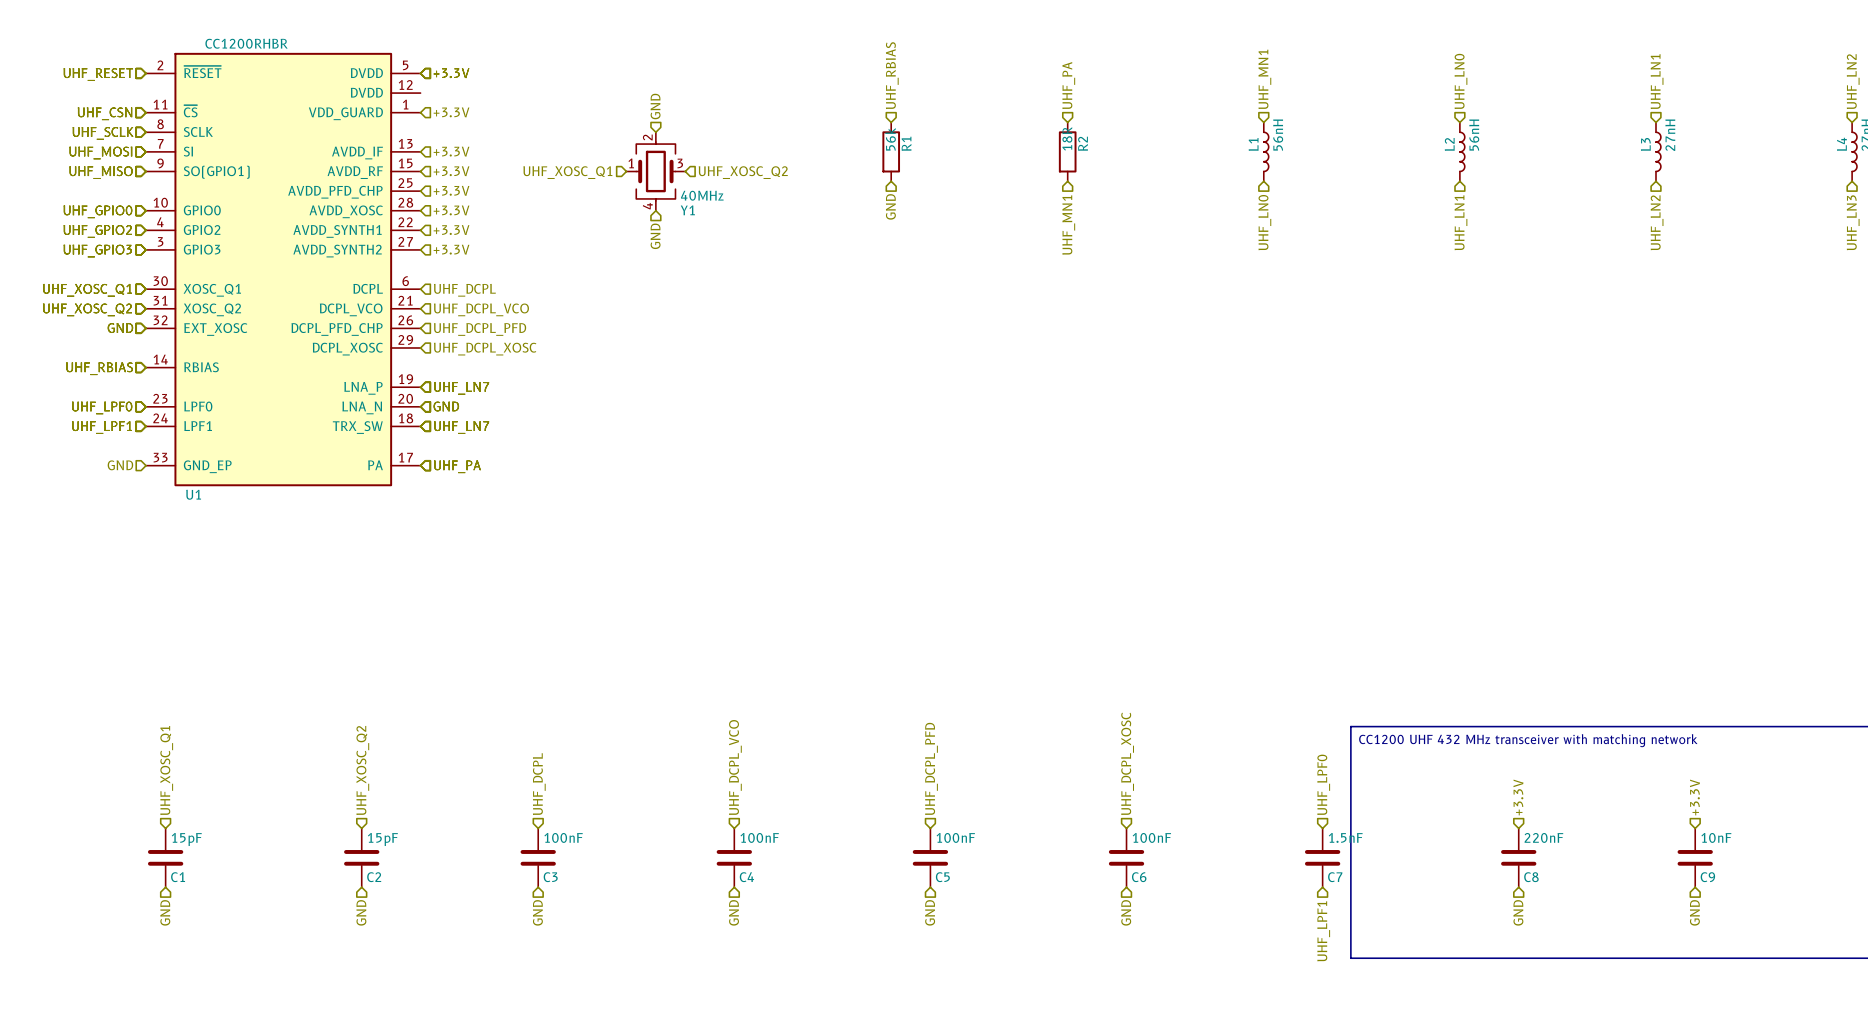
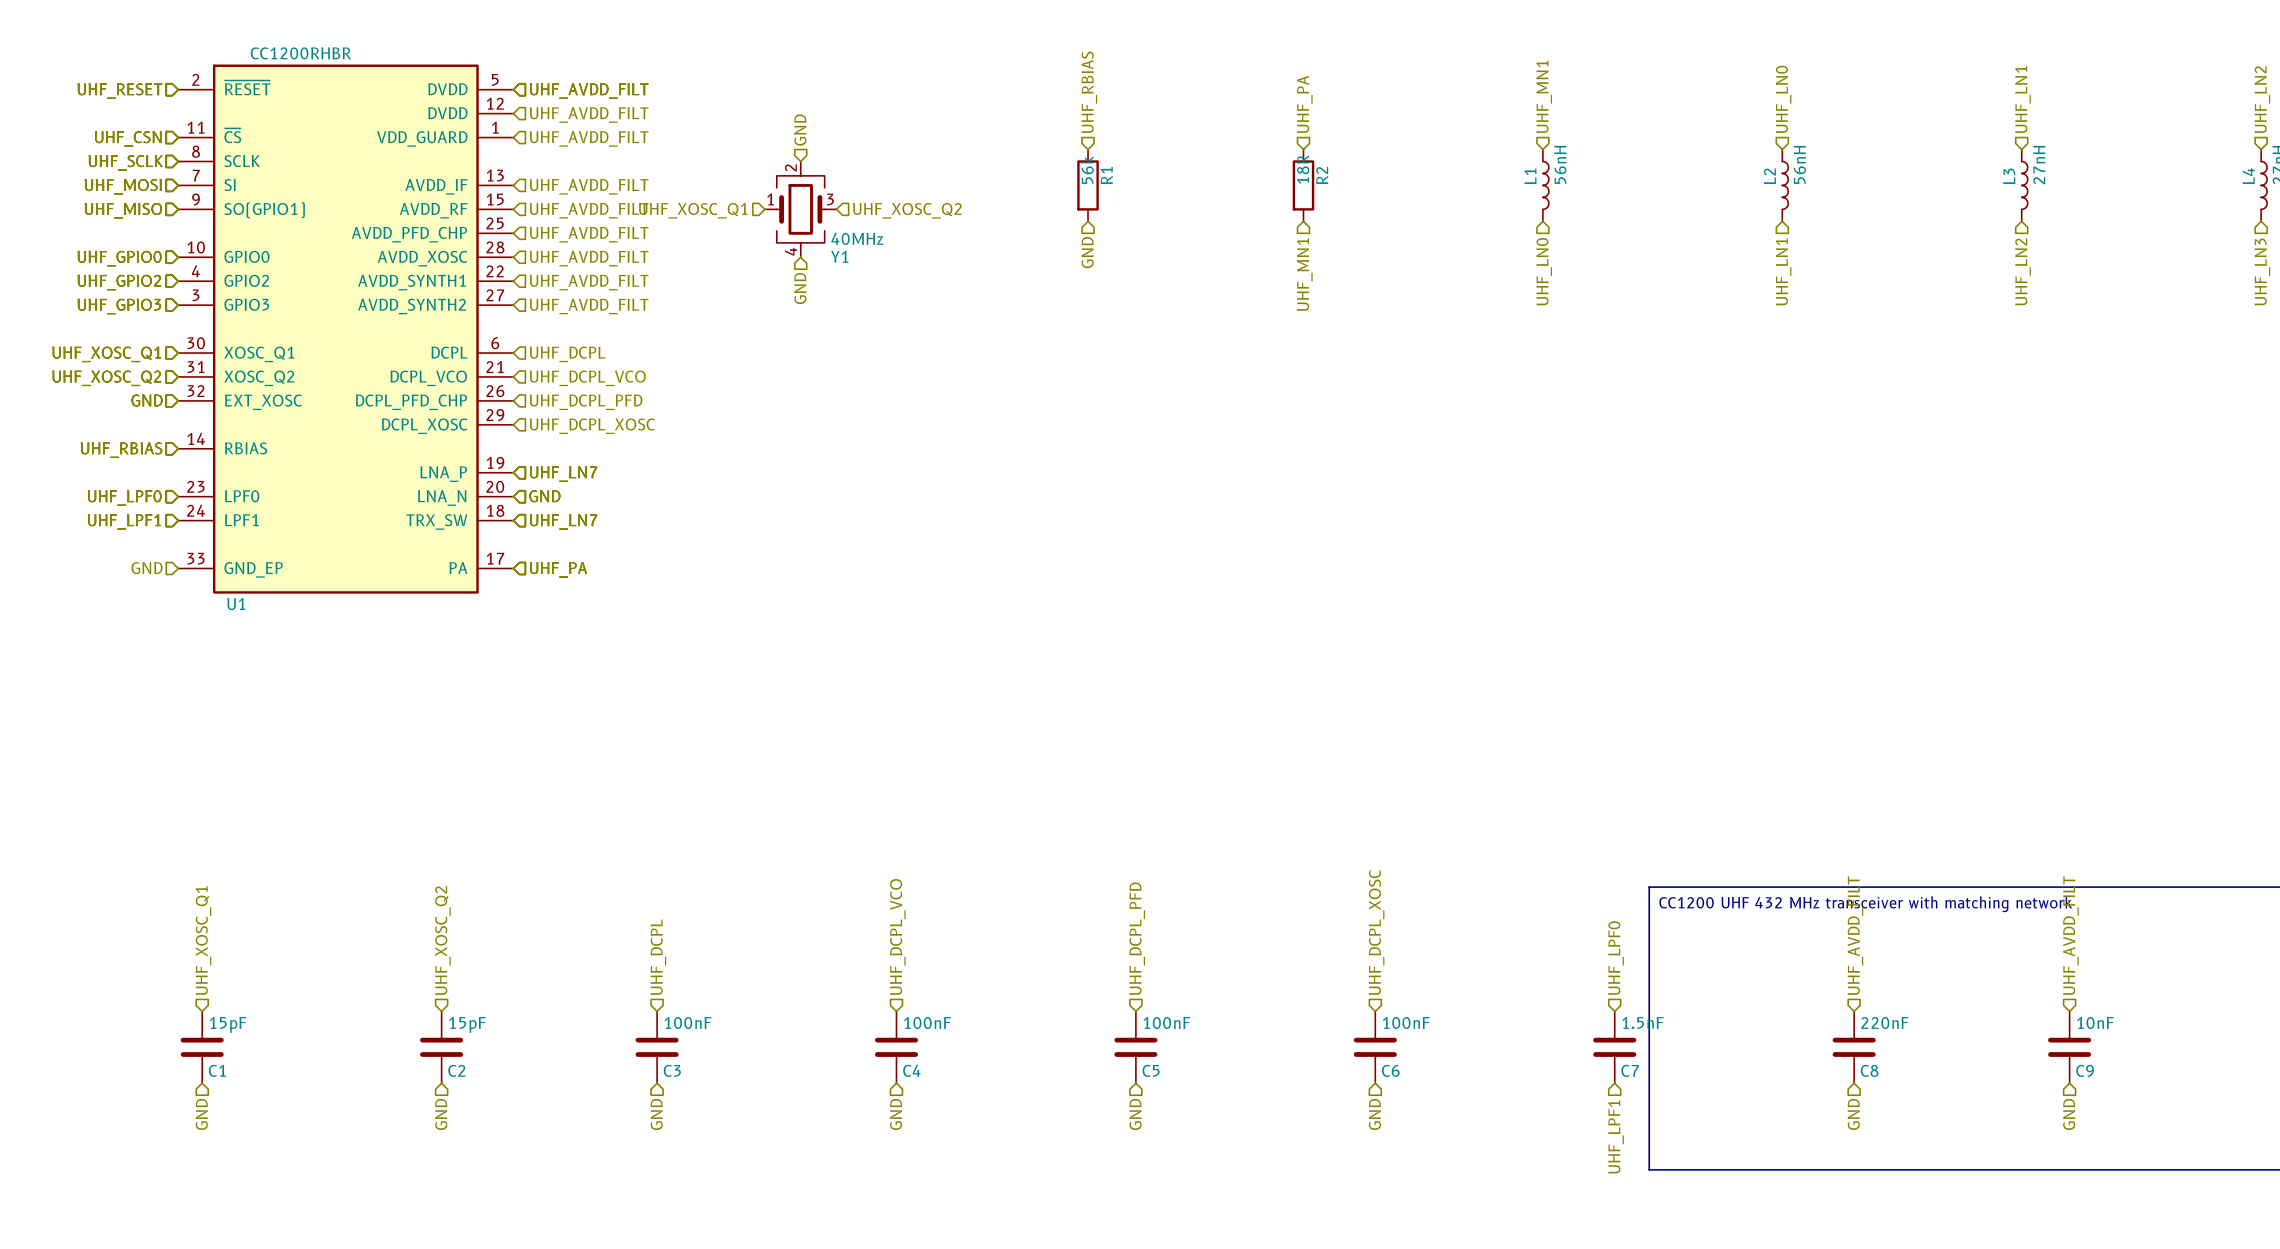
hierarchical label: +3.3V (451, 73) -> UHF_AVDD_FILT (589, 91)
hierarchical label: none -> UHF_AVDD_FILT (589, 114)
hierarchical label: +3.3V (451, 112) -> UHF_AVDD_FILT (589, 138)
hierarchical label: +3.3V (451, 151) -> UHF_AVDD_FILT (589, 186)
hierarchical label: +3.3V (451, 171) -> UHF_AVDD_FILT (589, 210)
hierarchical label: +3.3V (451, 190) -> UHF_AVDD_FILT (589, 234)
hierarchical label: +3.3V (451, 210) -> UHF_AVDD_FILT (589, 258)
hierarchical label: +3.3V (451, 230) -> UHF_AVDD_FILT (589, 282)
hierarchical label: +3.3V (451, 249) -> UHF_AVDD_FILT (589, 306)
hierarchical label: +3.3V (1518, 797) -> UHF_AVDD_FILT (1855, 935)
hierarchical label: +3.3V (1694, 797) -> UHF_AVDD_FILT (2070, 935)

